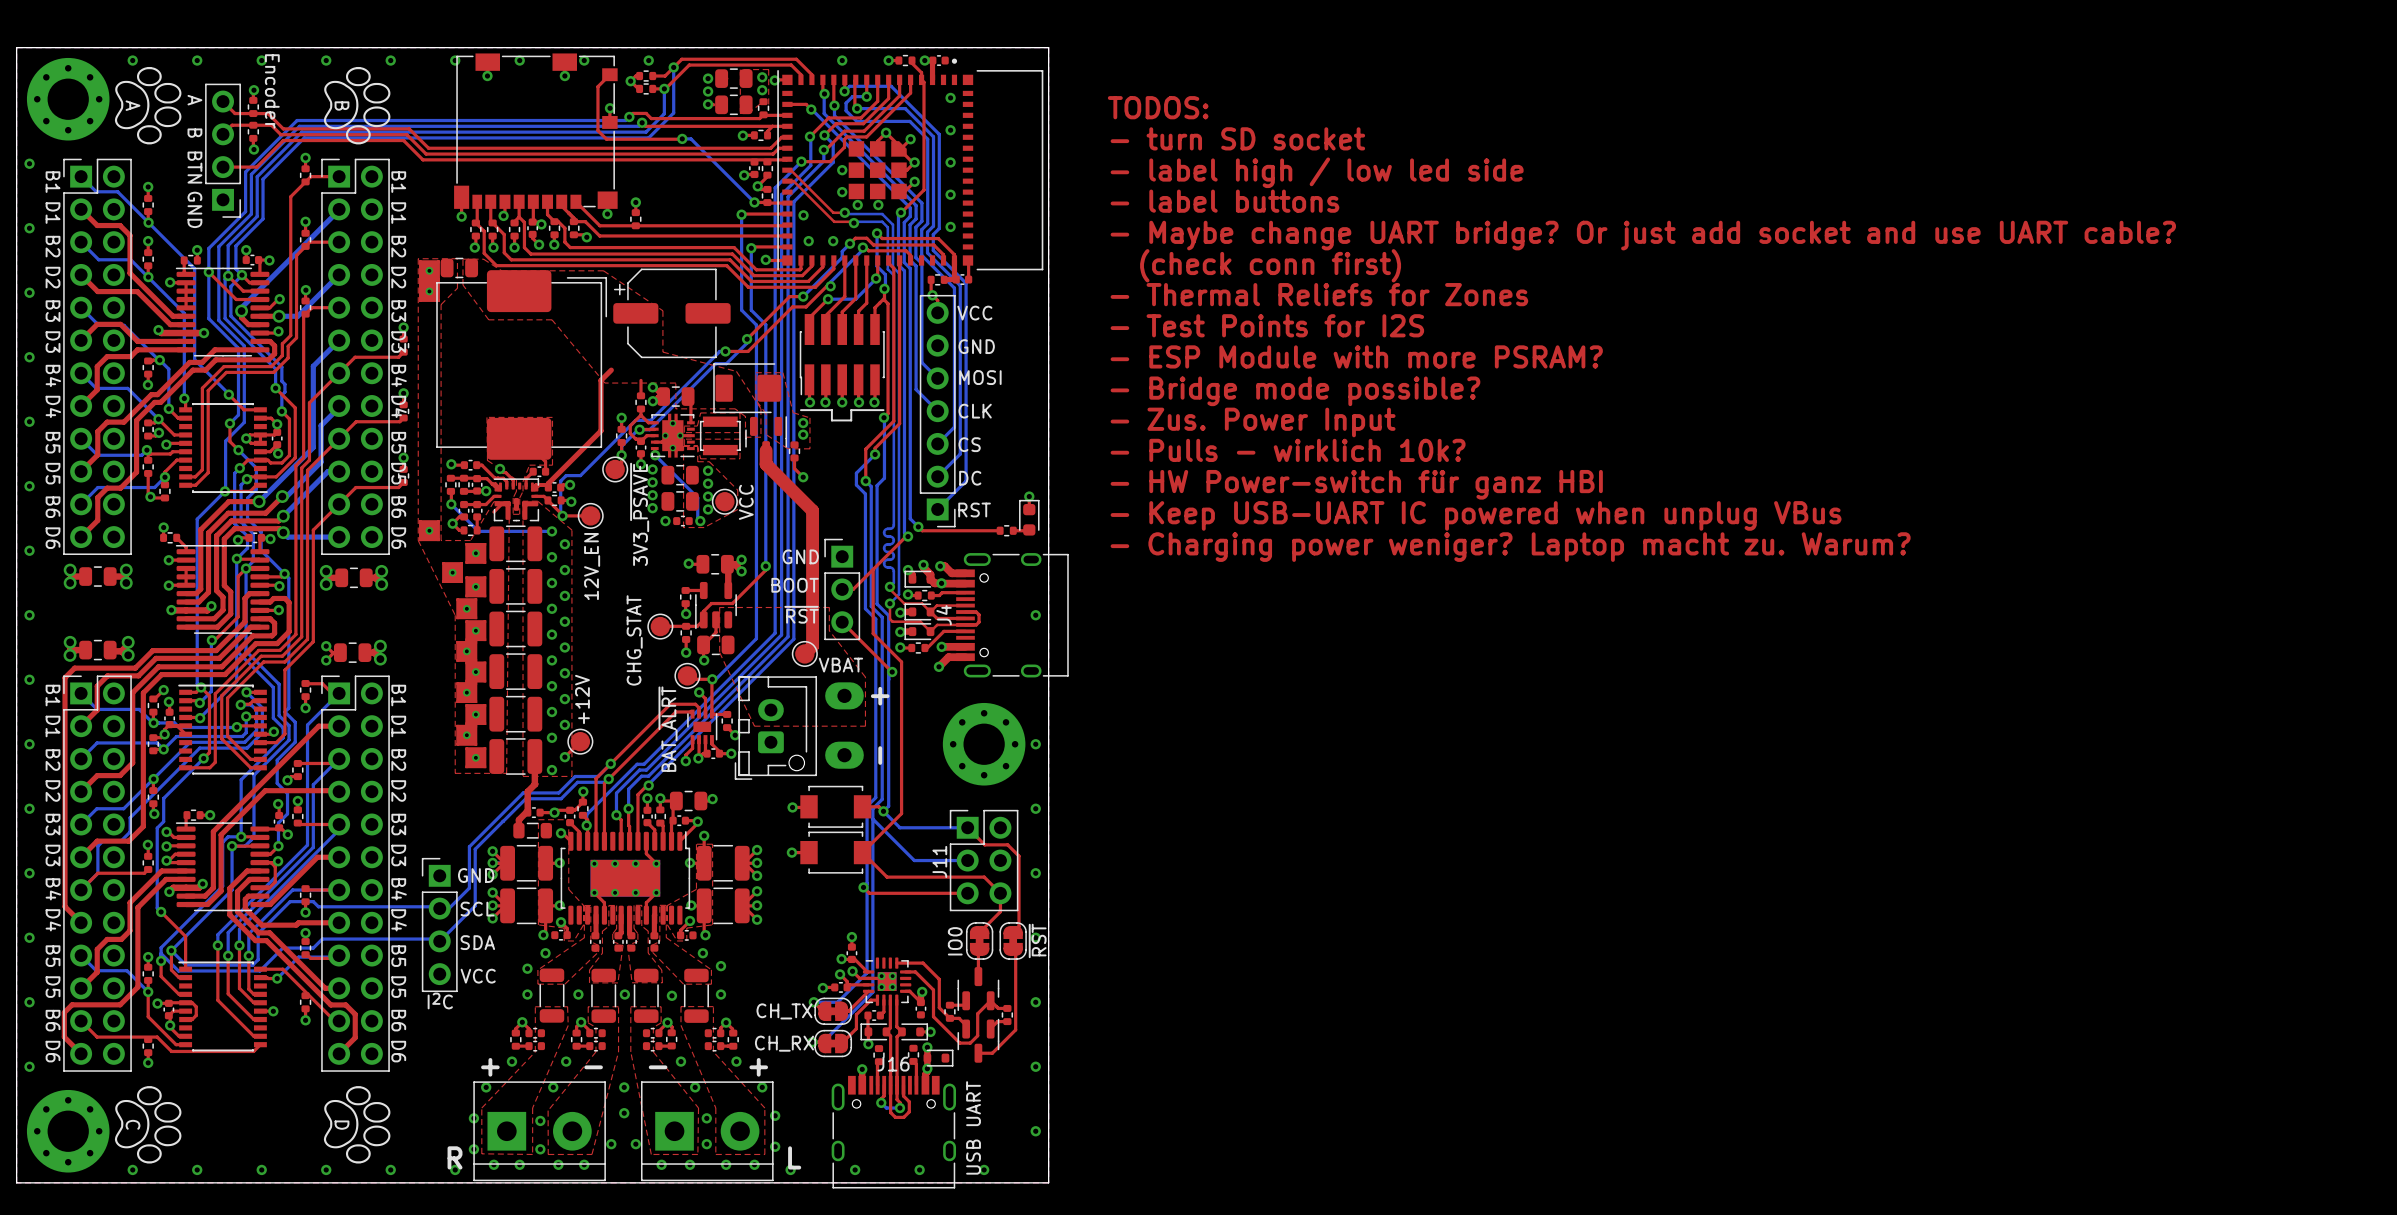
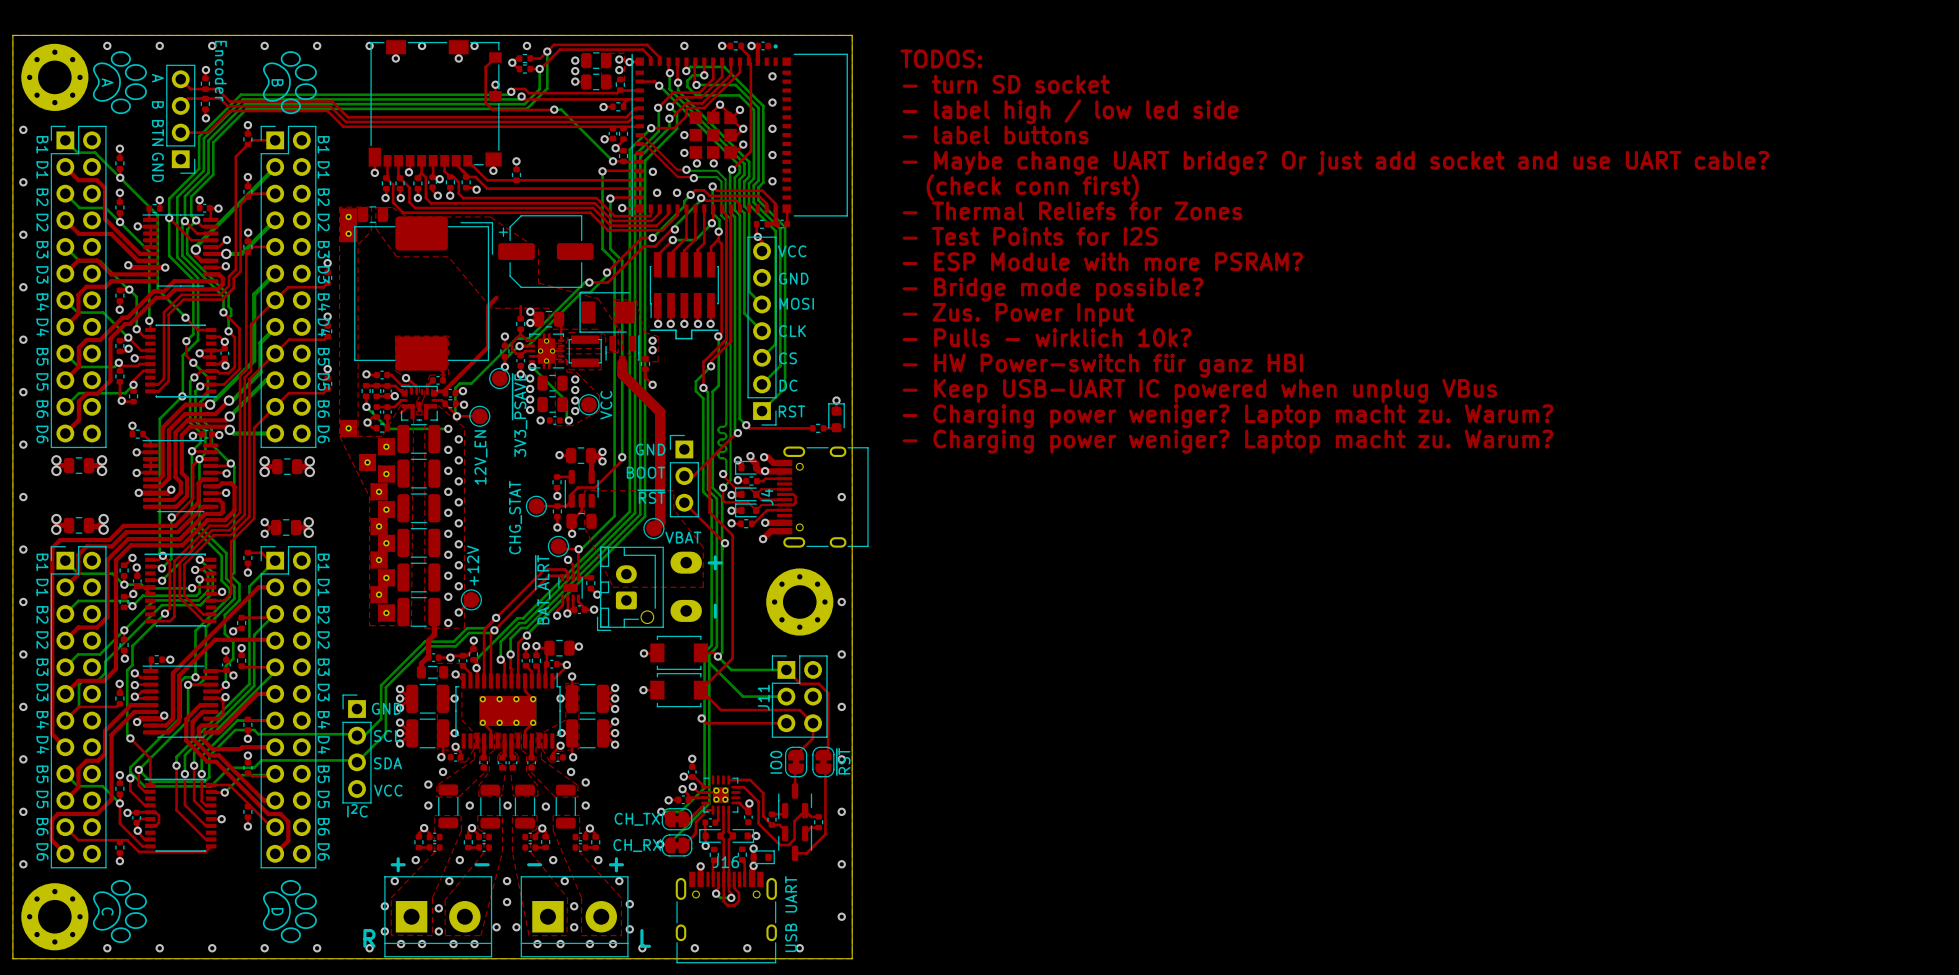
text: none -> TODOS: (941, 58)
text: TODOS: (1158, 107) -> - turn SD socket (1006, 84)
text: - turn SD socket (1237, 138) -> - label high / low led side (1070, 111)
text: - label high / low led side (1317, 172) -> - label buttons (995, 134)
text: - label buttons (1224, 201) -> - Maybe change UART bridge? Or just add socket and use UART cable? (1335, 162)
text: - Maybe change UART bridge? Or just add socket and use UART cable? (1643, 235) -> (check conn first) (1032, 187)
text: (check conn first) (1270, 265) -> - Thermal Reliefs for Zones (1072, 210)
text: - Thermal Reliefs for Zones (1319, 294) -> - Test Points for I2S (1030, 236)
text: - Test Points for I2S (1267, 325) -> - ESP Module with more PSRAM? (1102, 261)
text: - ESP Module with more PSRAM? (1356, 356) -> - Bridge mode possible? (1052, 289)
text: - Bridge mode possible? (1295, 391) -> - Zus. Power Input (1018, 314)
text: - Zus. Power Input (1253, 422) -> - Pulls - wirklich 10k? (1046, 337)
text: - Pulls - wirklich 10k? (1288, 450) -> - HW Power-switch für ganz HBI (1102, 365)
text: - HW Power-switch für ganz HBI (1356, 484) -> - Keep USB-UART IC powered when unplug VBus (1199, 390)
text: - Keep USB-UART IC powered when unplug VBus (1476, 515) -> - Charging power weniger? Laptop macht zu. Warum? (1227, 416)

